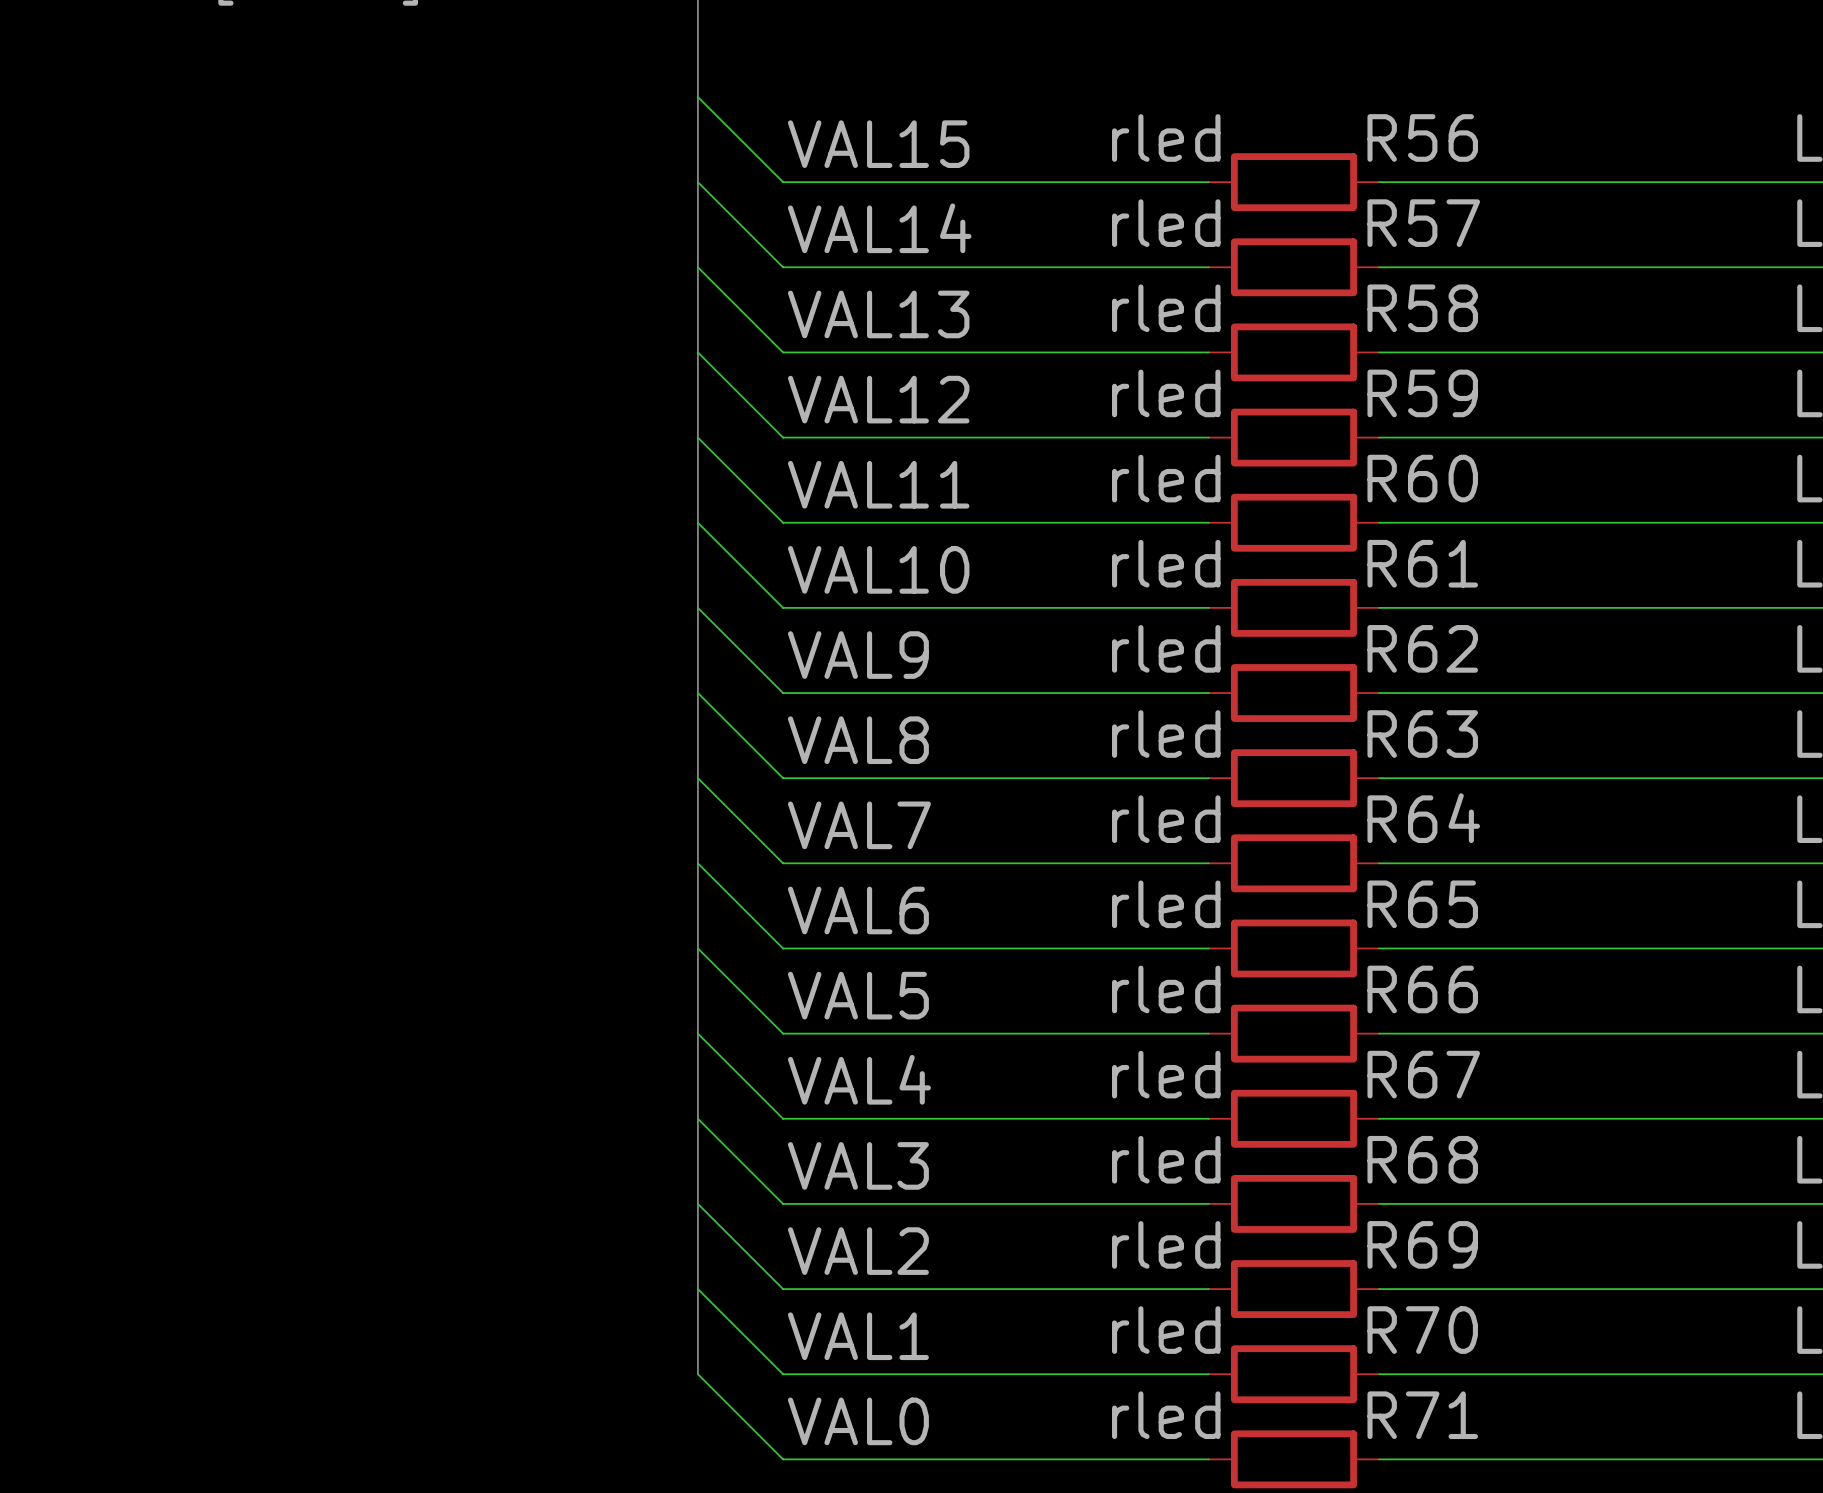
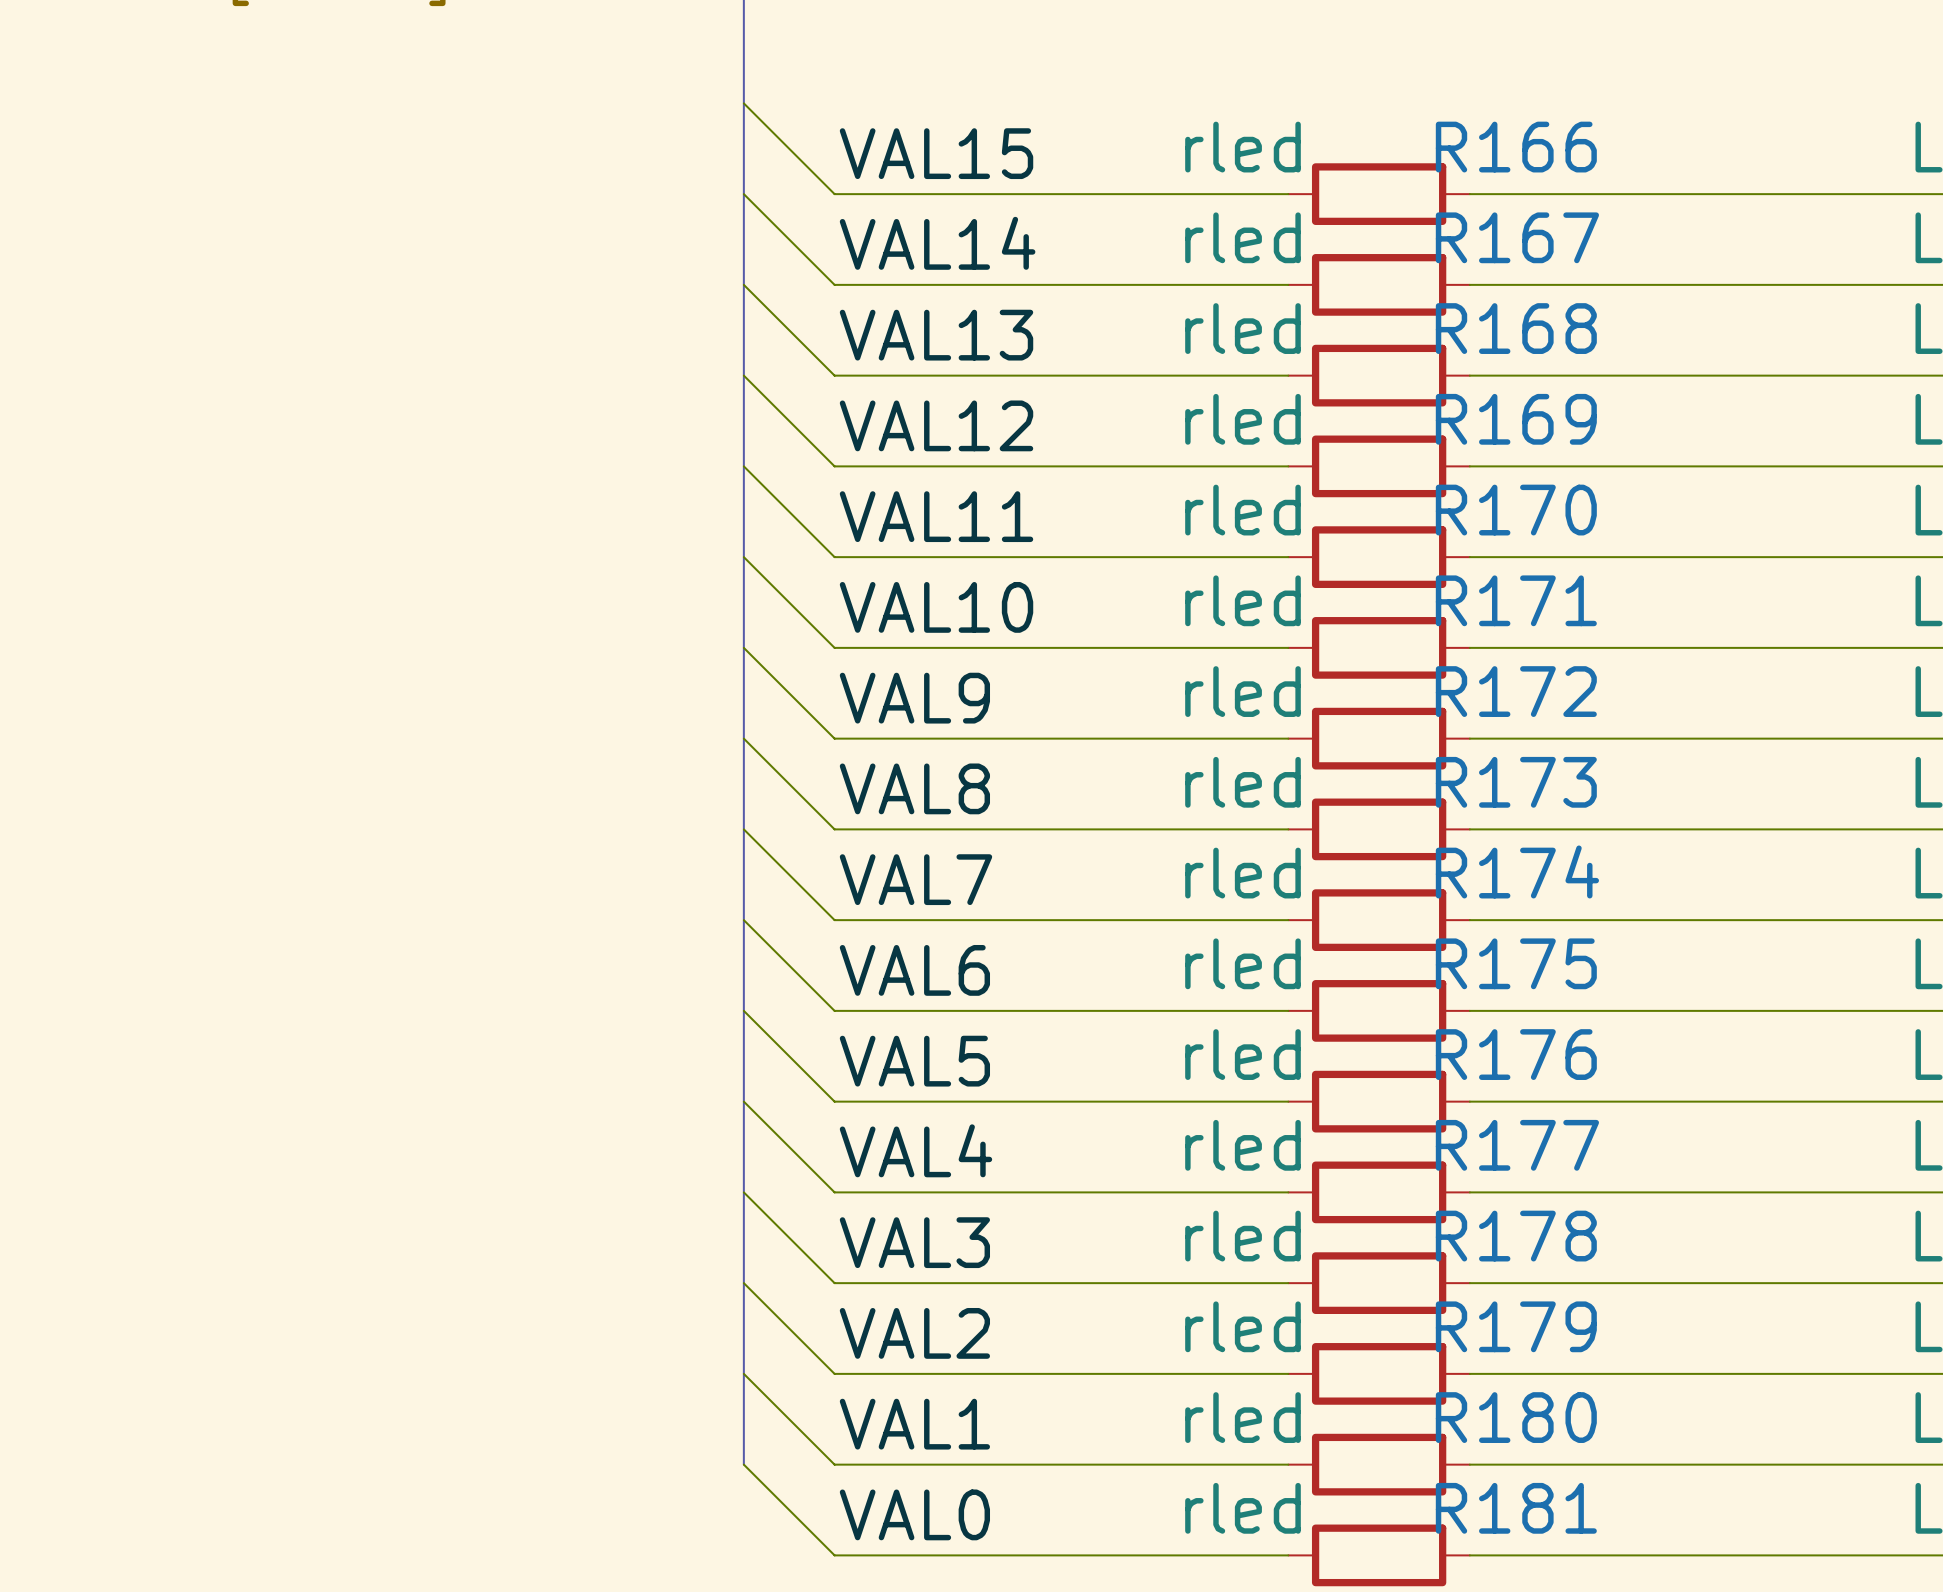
R56 name: R56 (1422, 137) -> R166 (1516, 147)
R57 name: R57 (1423, 223) -> R167 (1517, 237)
R58 name: R58 (1422, 308) -> R168 (1516, 328)
R59 name: R59 (1422, 393) -> R169 (1516, 419)
R60 name: R60 (1422, 478) -> R170 (1516, 510)
R61 name: R61 (1422, 563) -> R171 (1516, 600)
R62 name: R62 (1422, 648) -> R172 (1516, 691)
R63 name: R63 (1422, 734) -> R173 (1516, 782)
R64 name: R64 (1423, 818) -> R174 (1517, 871)
R65 name: R65 (1422, 904) -> R175 (1516, 963)
R66 name: R66 (1422, 989) -> R176 (1516, 1054)
R67 name: R67 (1423, 1074) -> R177 (1517, 1145)
R68 name: R68 (1422, 1159) -> R178 (1516, 1236)
R69 name: R69 (1422, 1244) -> R179 (1516, 1326)
R70 name: R70 (1422, 1330) -> R180 (1516, 1417)
R71 name: R71 (1422, 1415) -> R181 (1516, 1508)

